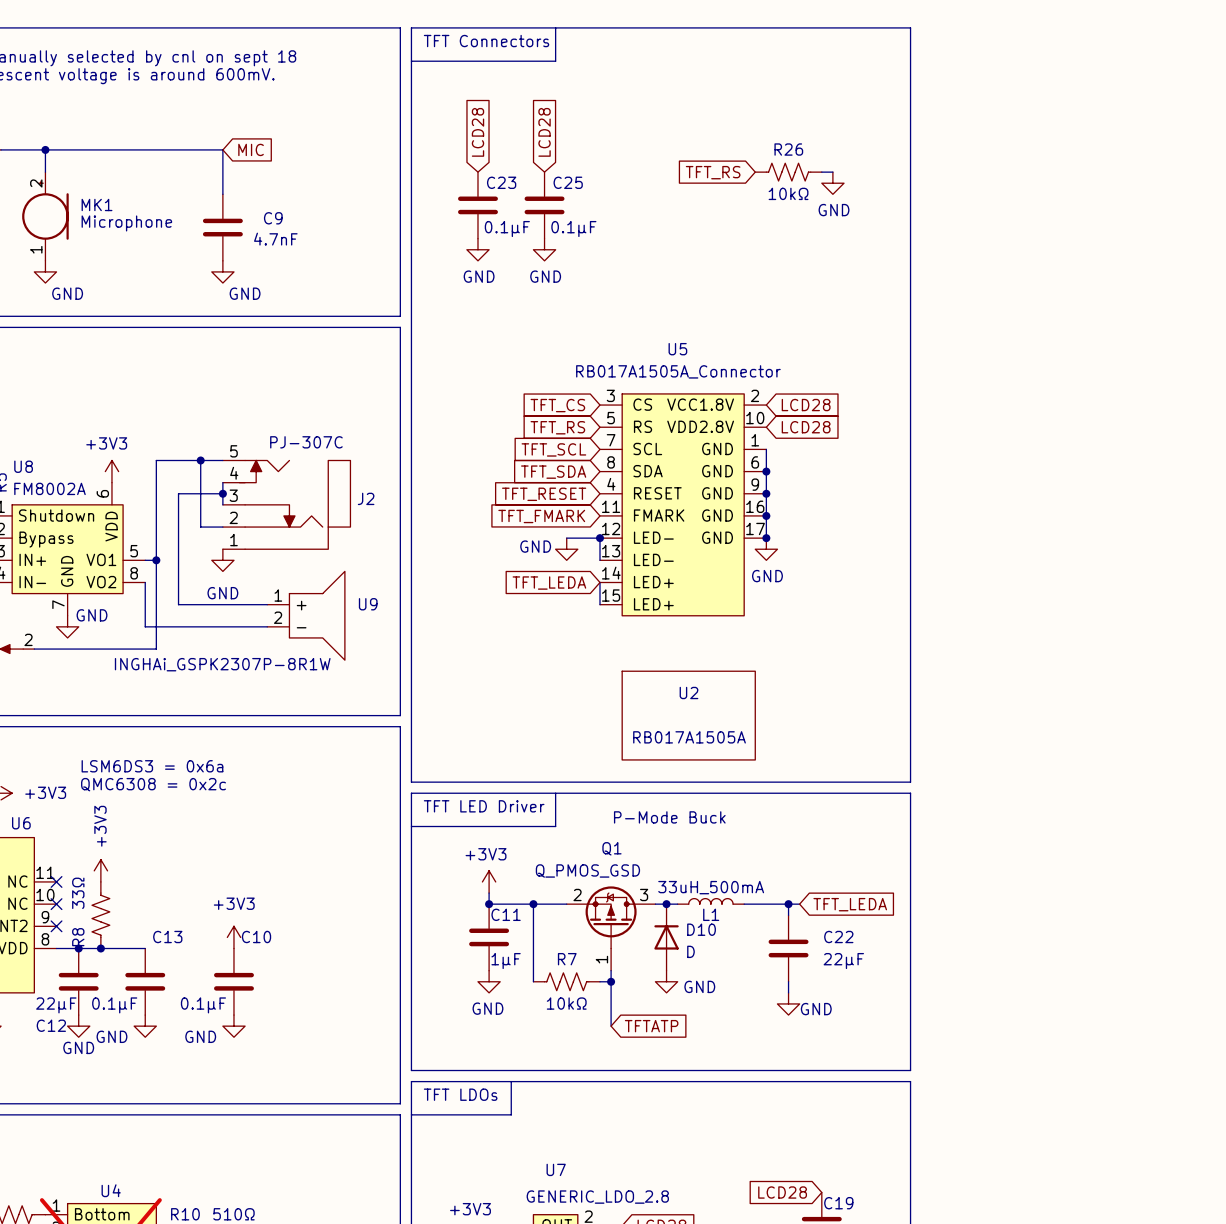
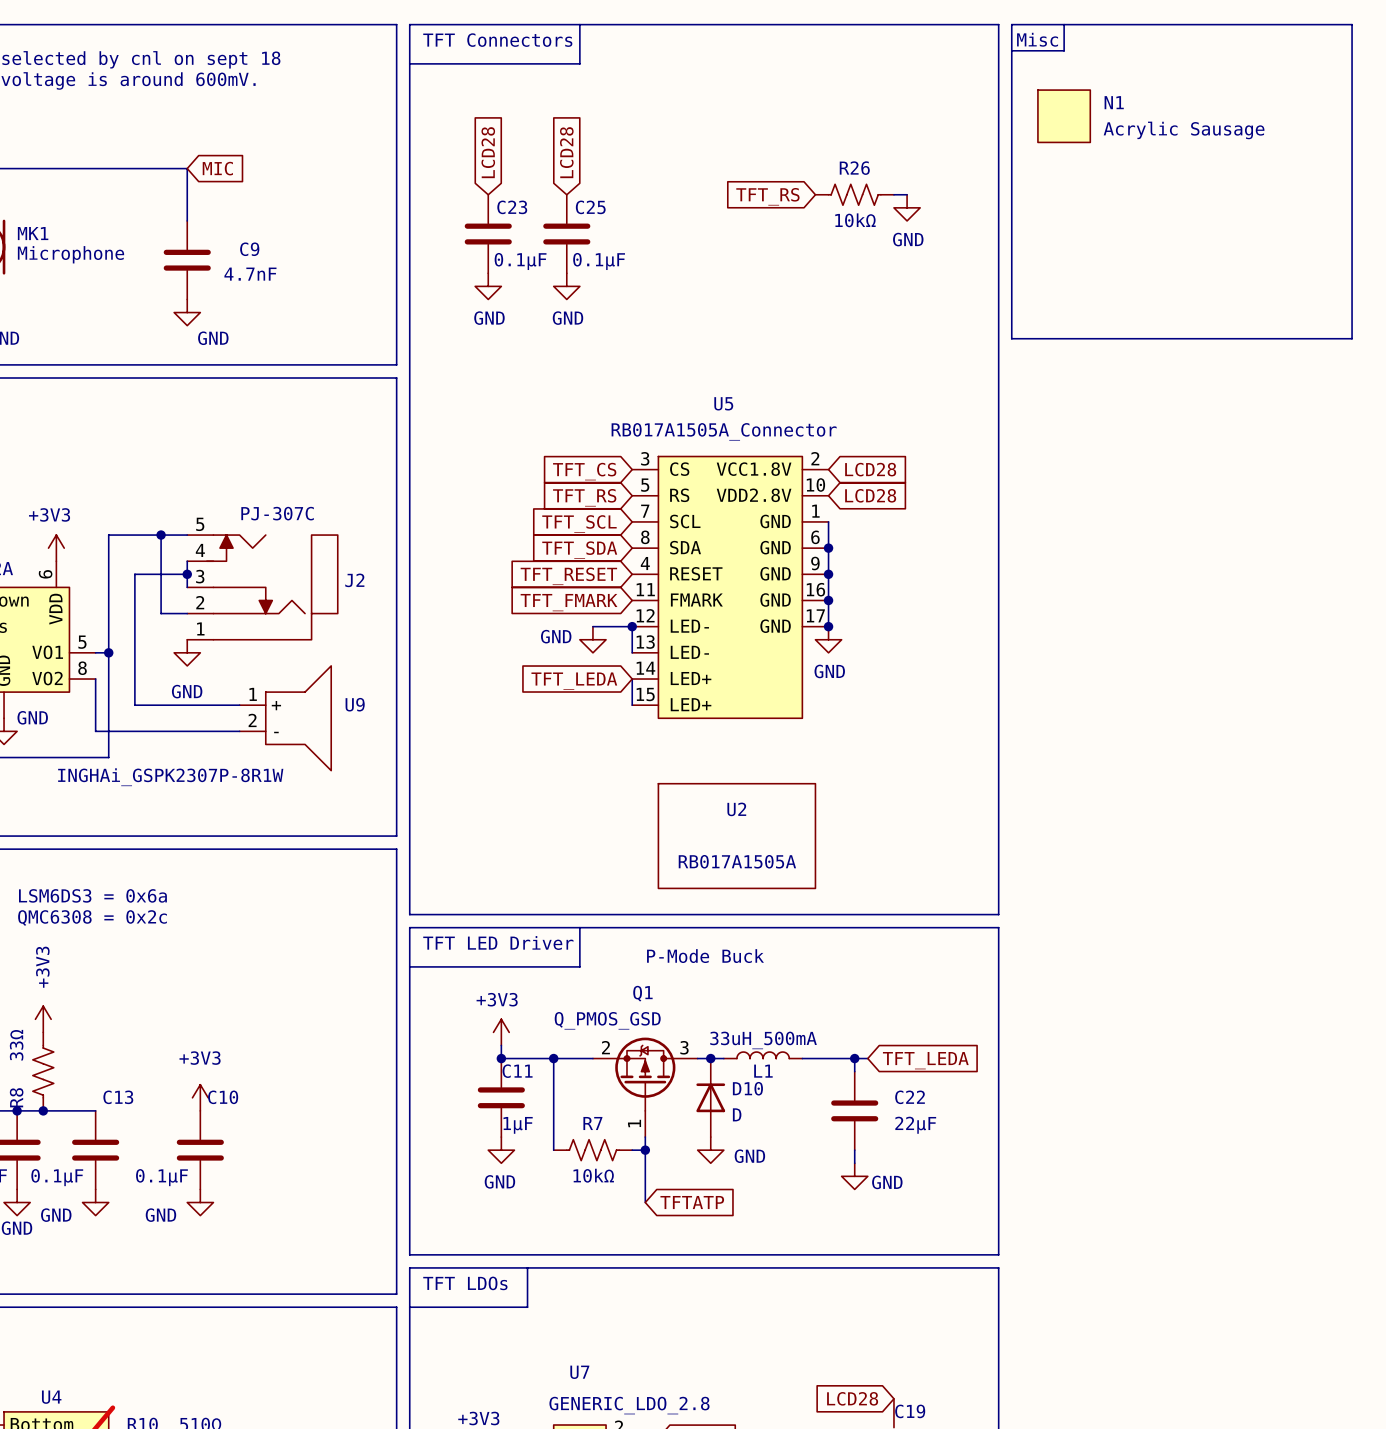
line: none -> (1011, 24) (1352, 24) (1352, 338) (1011, 338) (1011, 24)
line: none -> (1064, 24) (1064, 50) (1011, 50)
text: none -> Misc (1037, 39)
N1: none -> Acrylic Sausage (1064, 116)

